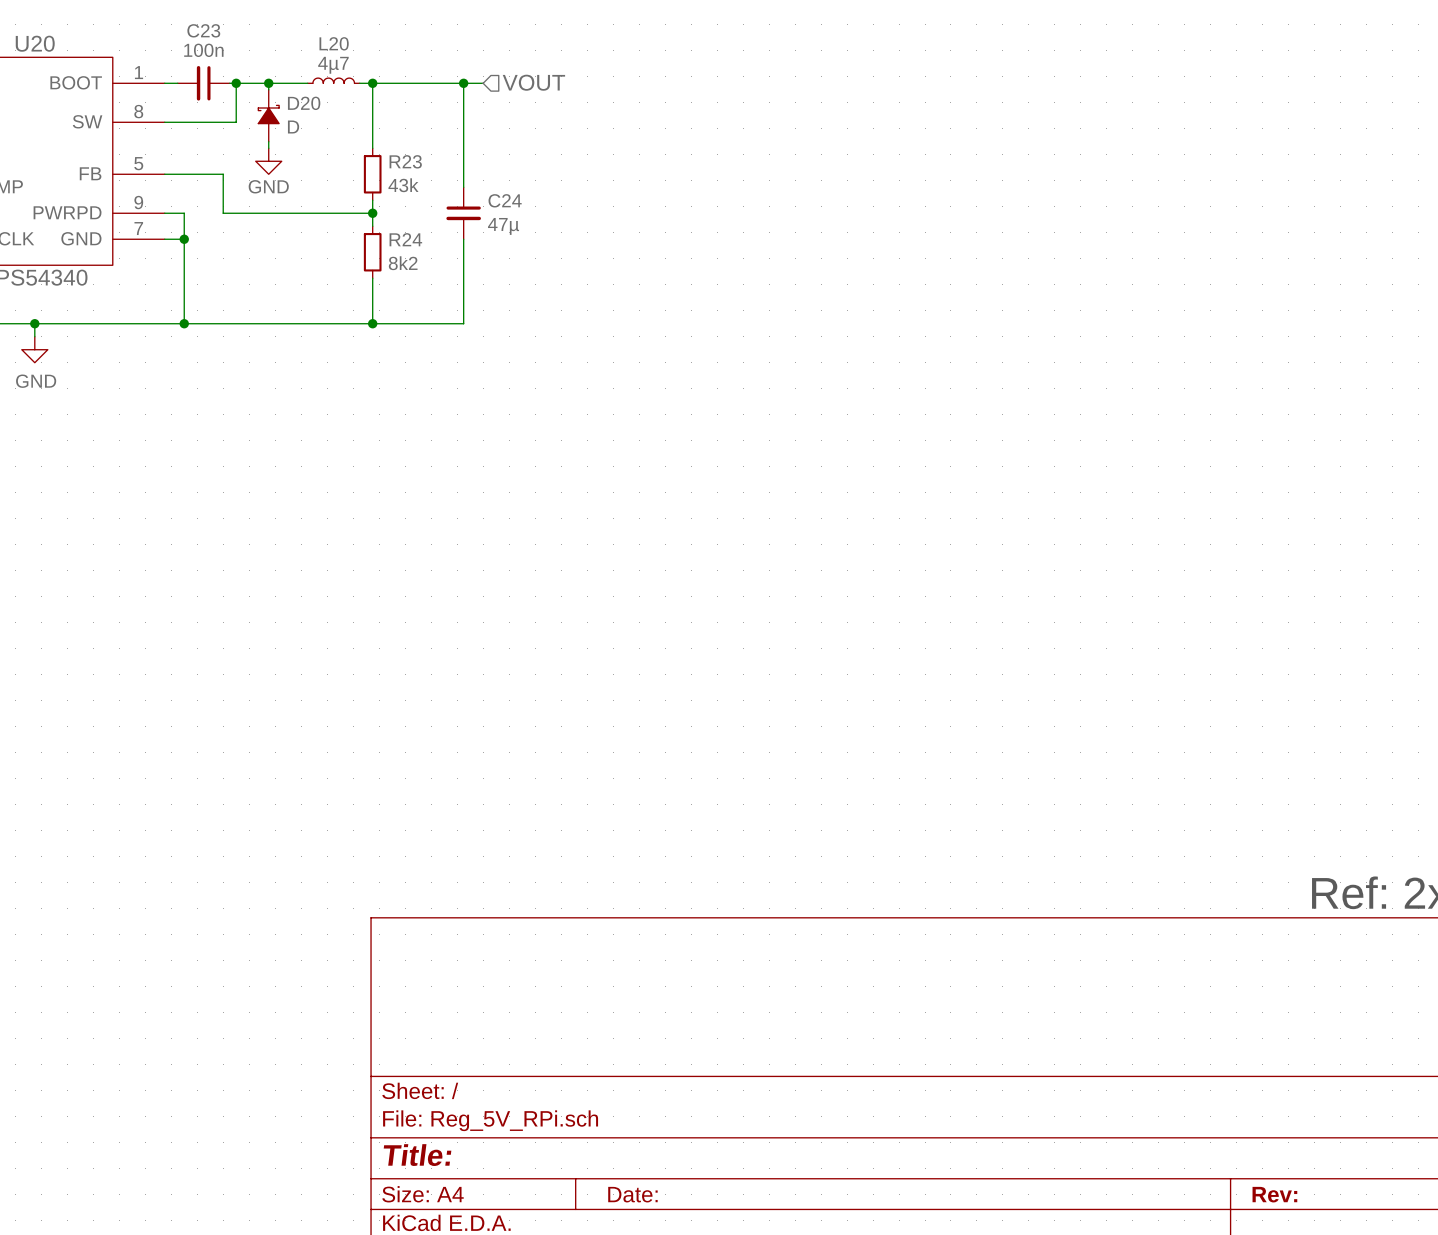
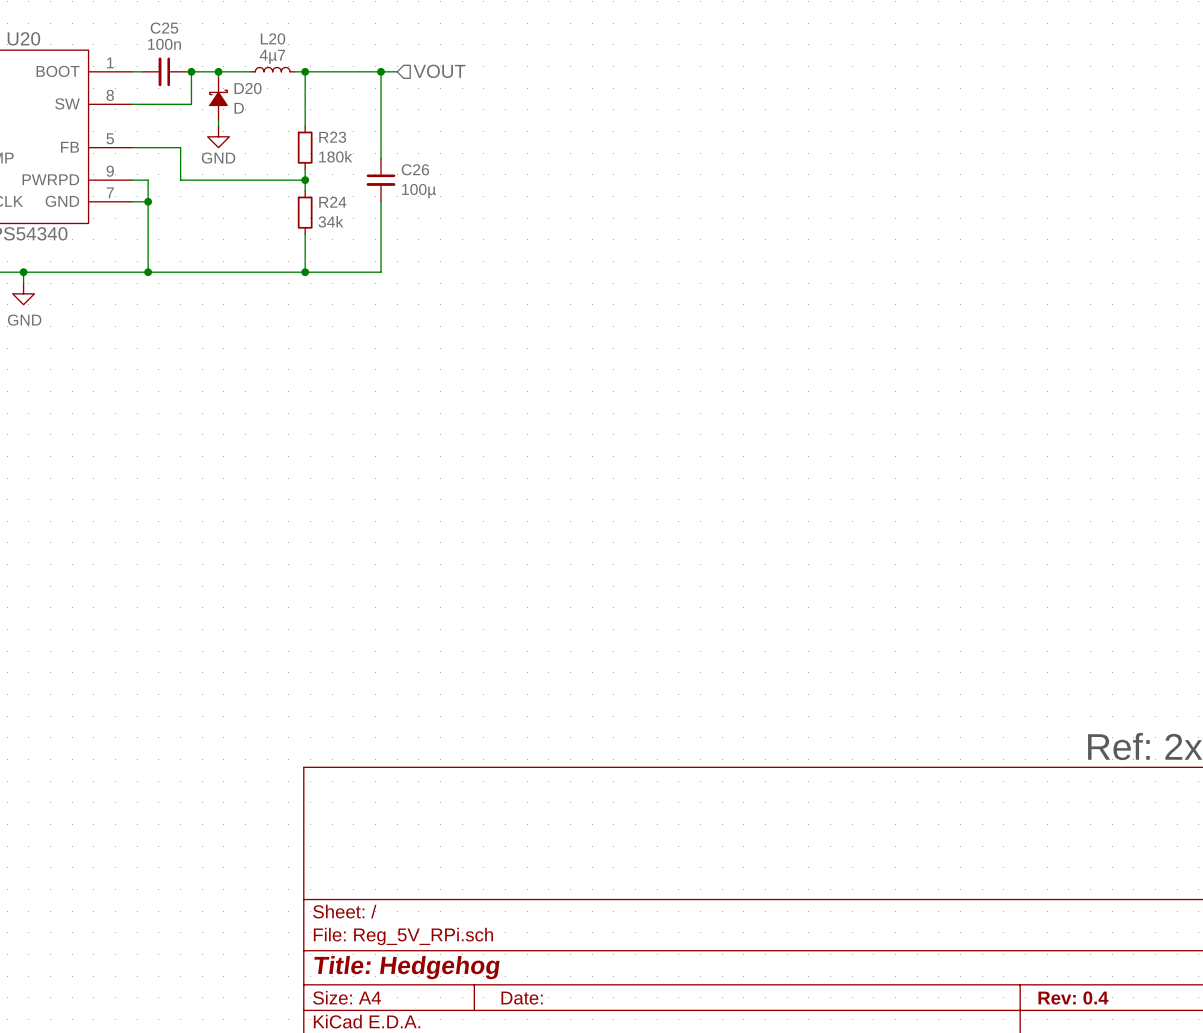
C23 name: C23 (203, 30) -> C25 (164, 28)
R23 value: 43k (403, 185) -> 180k (335, 156)
C24 name: C24 (505, 200) -> C26 (415, 169)
C24 value: 47µ (503, 226) -> 100µ (419, 191)
R24 value: 8k2 (403, 263) -> 34k (330, 221)
title block: Title: (417, 1155) -> Title: Hedgehog (406, 967)
title block: Rev: (1274, 1194) -> Rev: 0.4 (1073, 997)

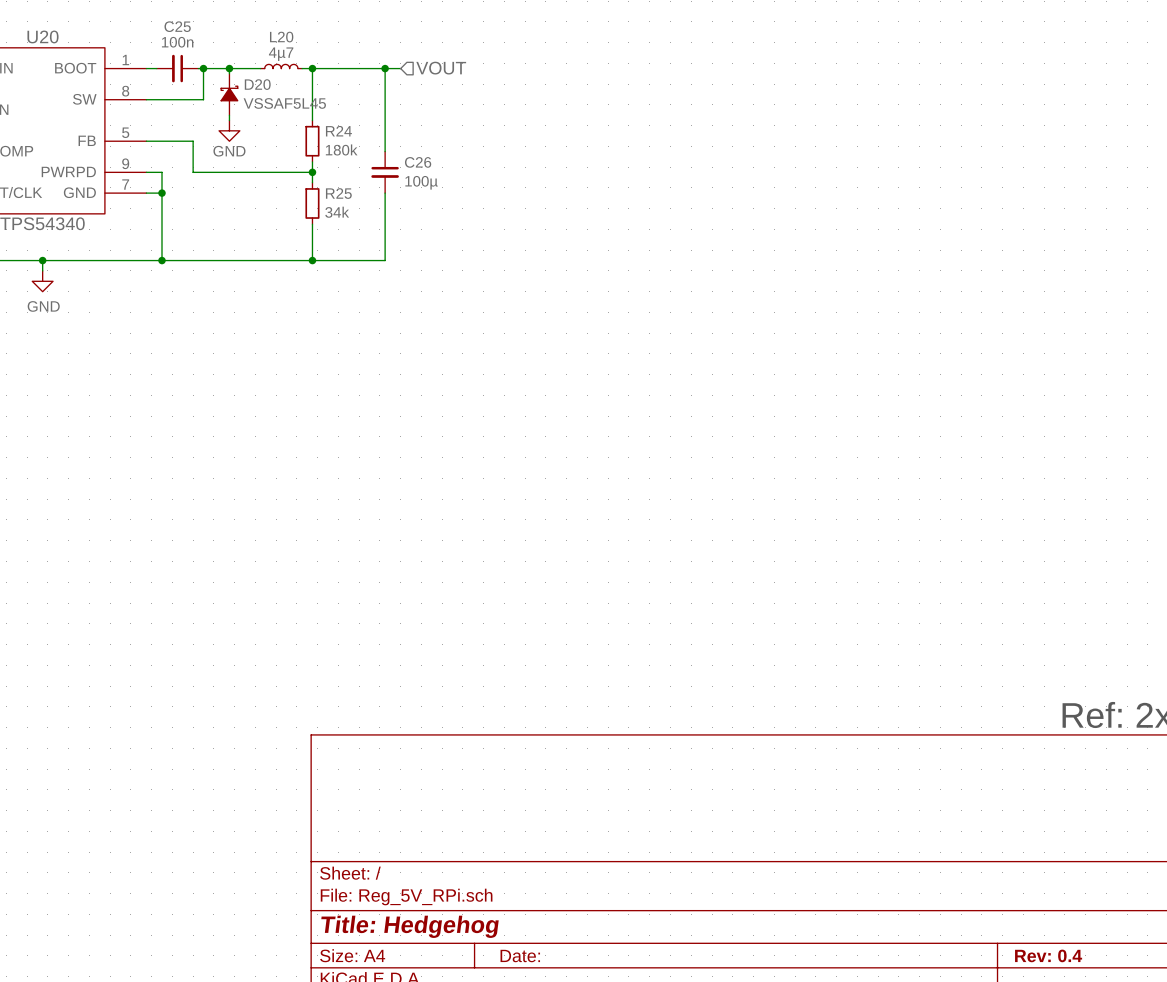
D20 value: D (239, 108) -> VSSAF5L45 (284, 103)
R23 name: R23 (332, 137) -> R24 (338, 131)
R24 name: R24 (332, 202) -> R25 (338, 193)

